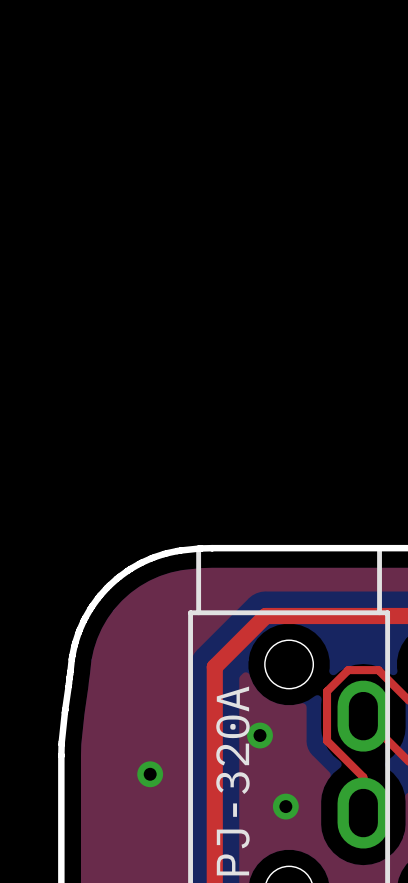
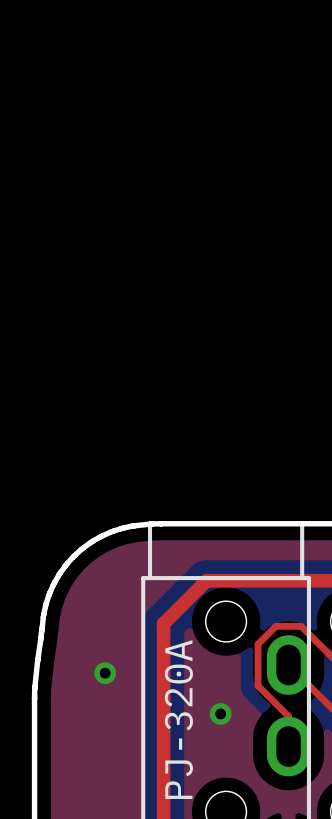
via: (260, 735) -> none
via position: (150, 774) -> (105, 673)
via: none -> (220, 713)
via: (285, 806) -> none

